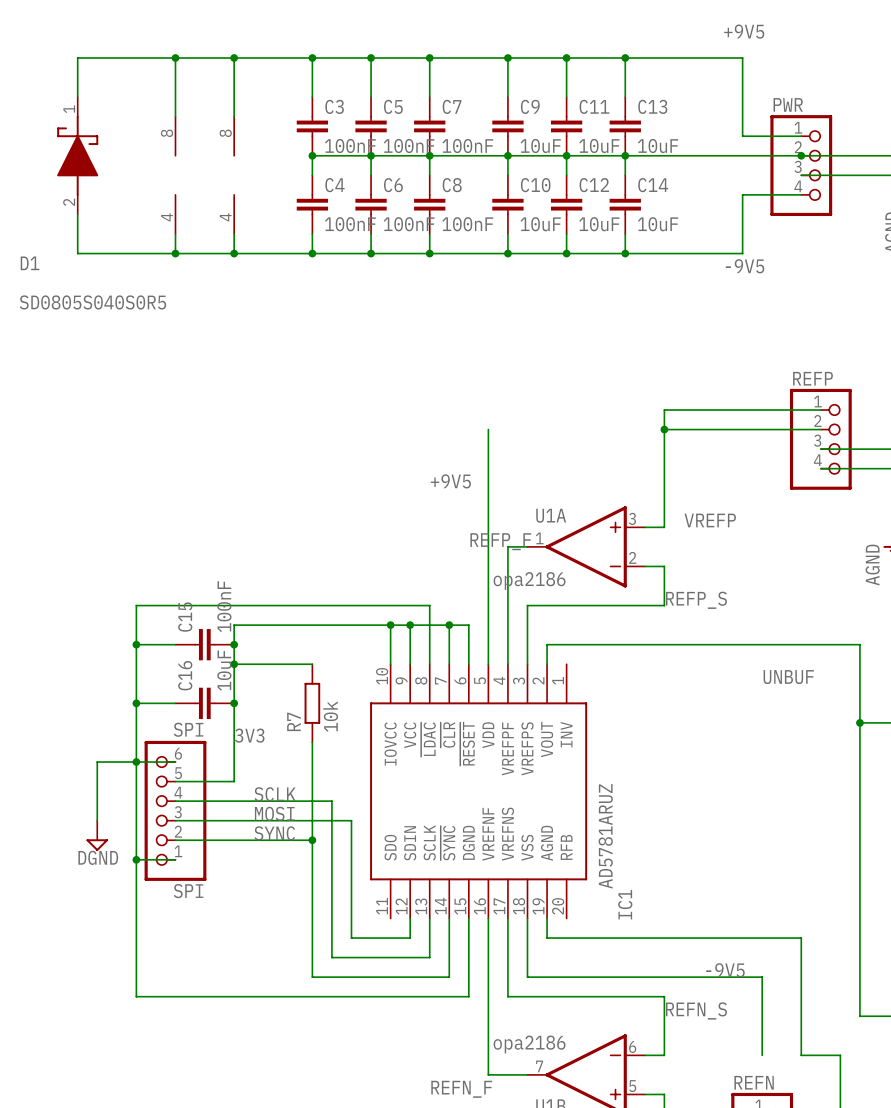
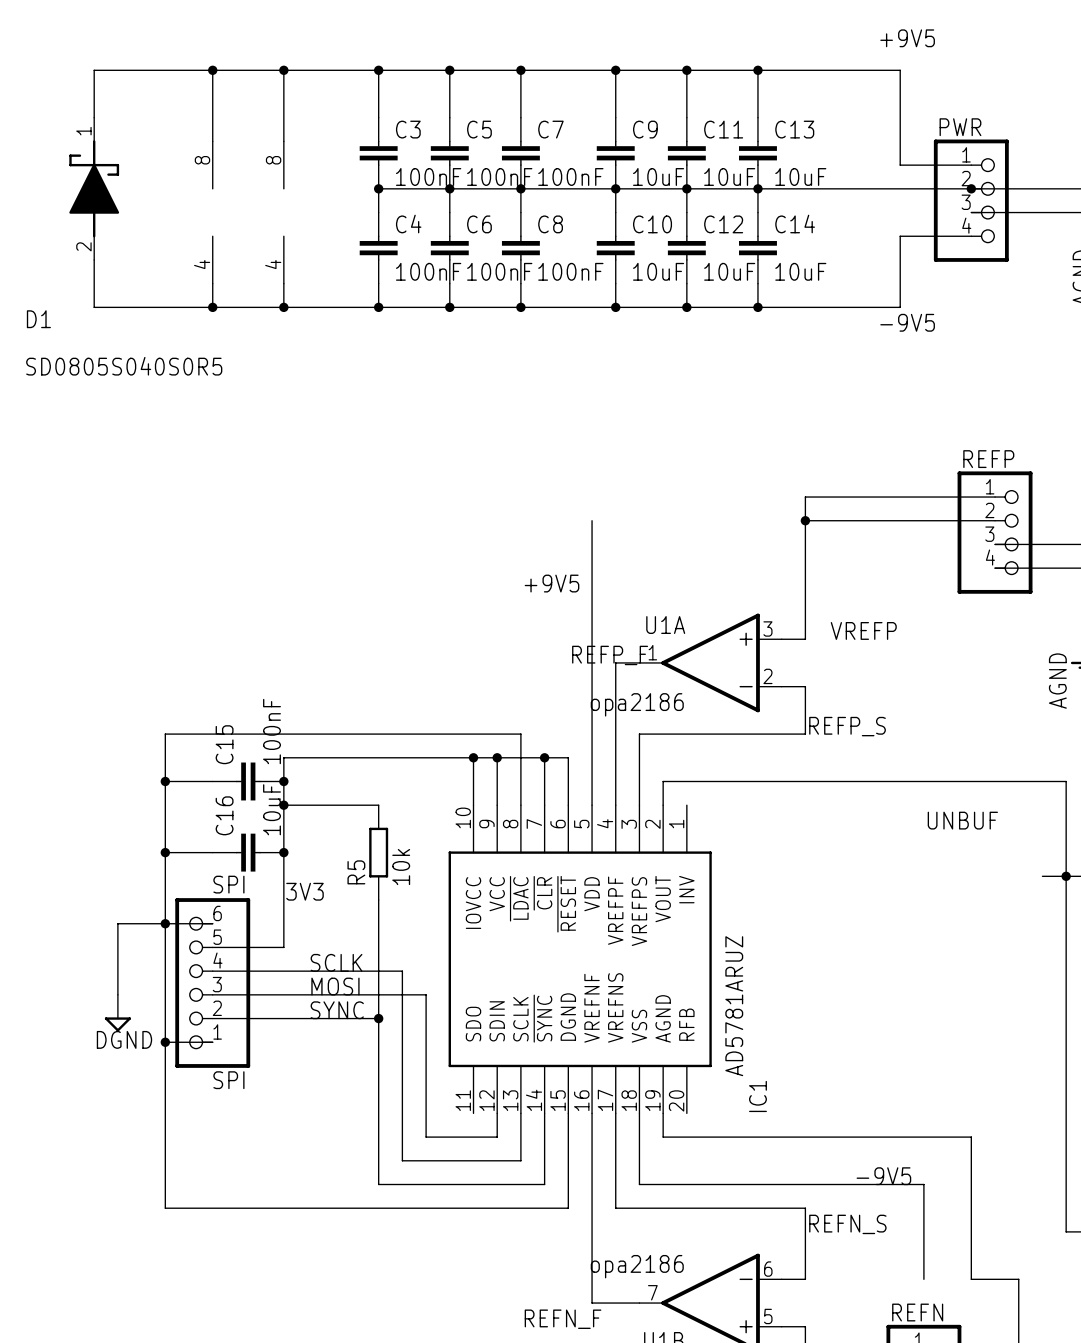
wire: (859, 644) (859, 1016) (879, 1016) -> (1042, 781) (1066, 781) (1066, 1231)
R7 name: R7 (294, 721) -> R5 (356, 872)
junction position: (859, 722) -> (1066, 876)

